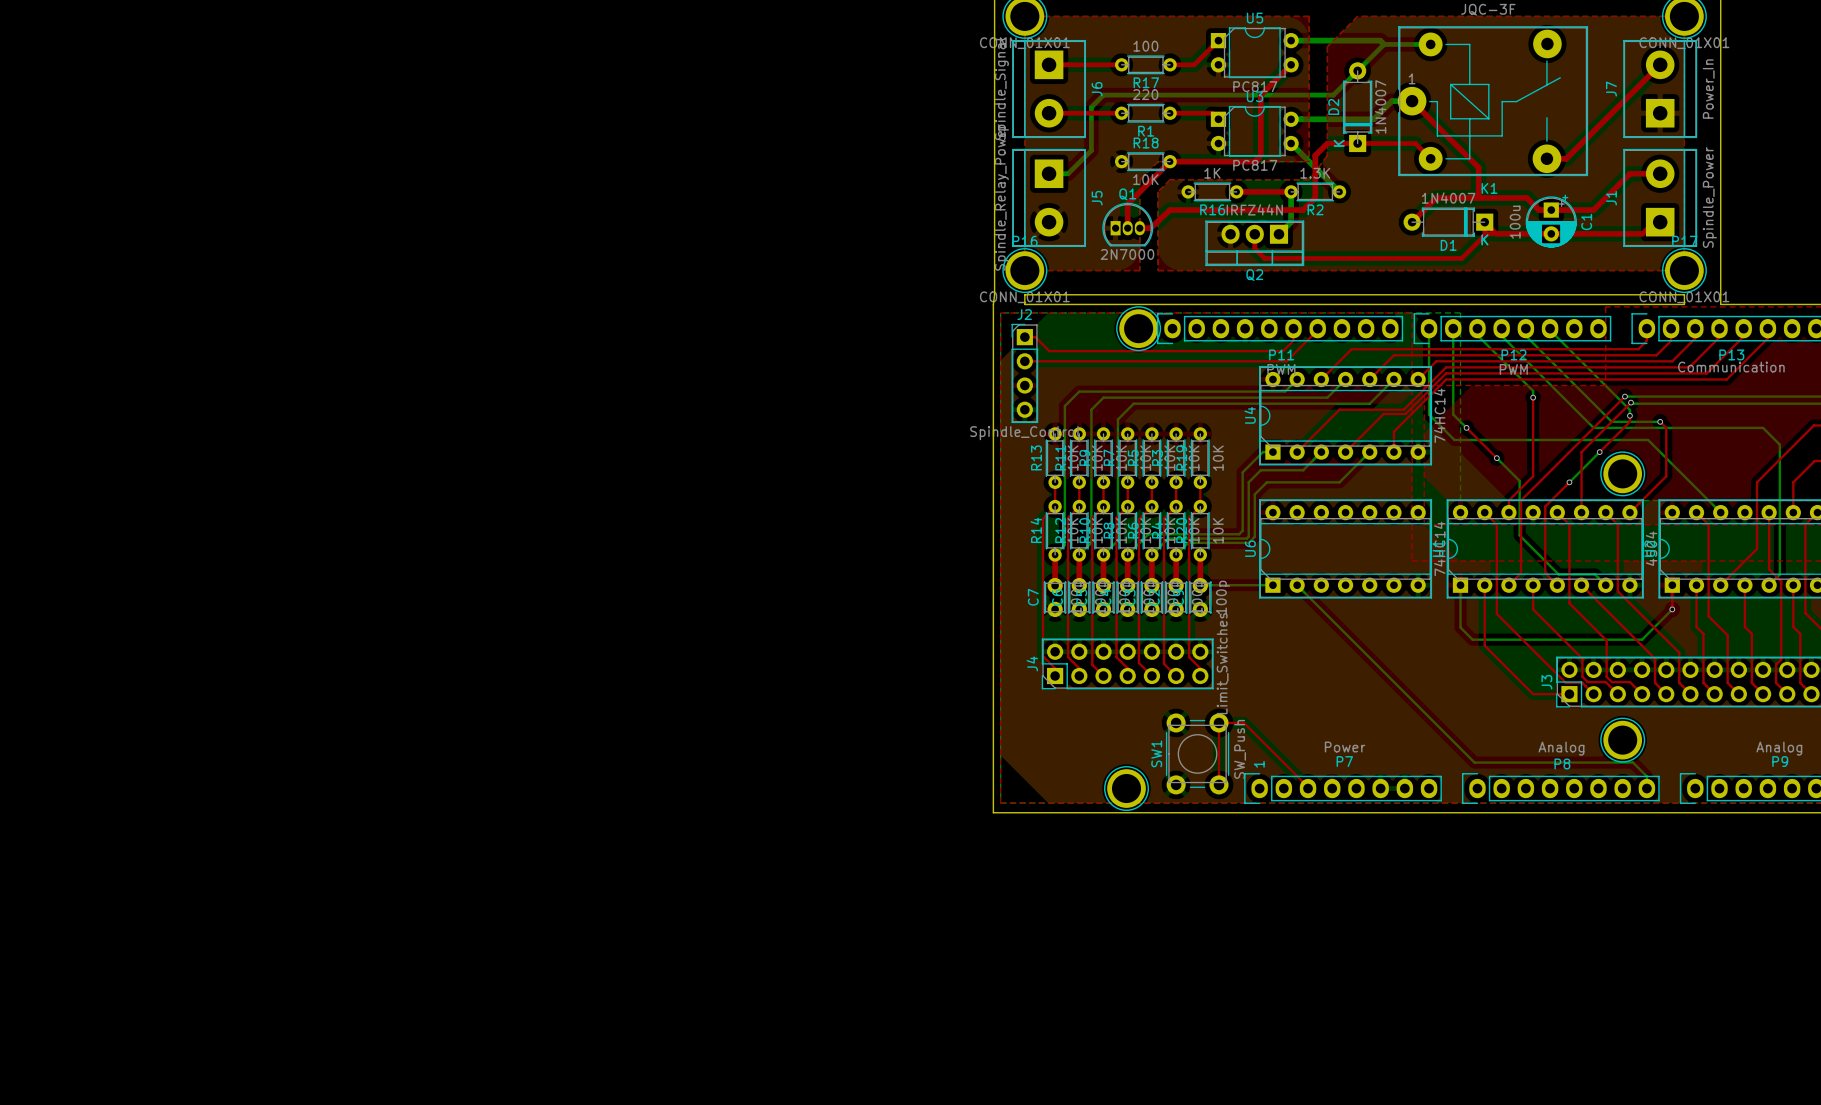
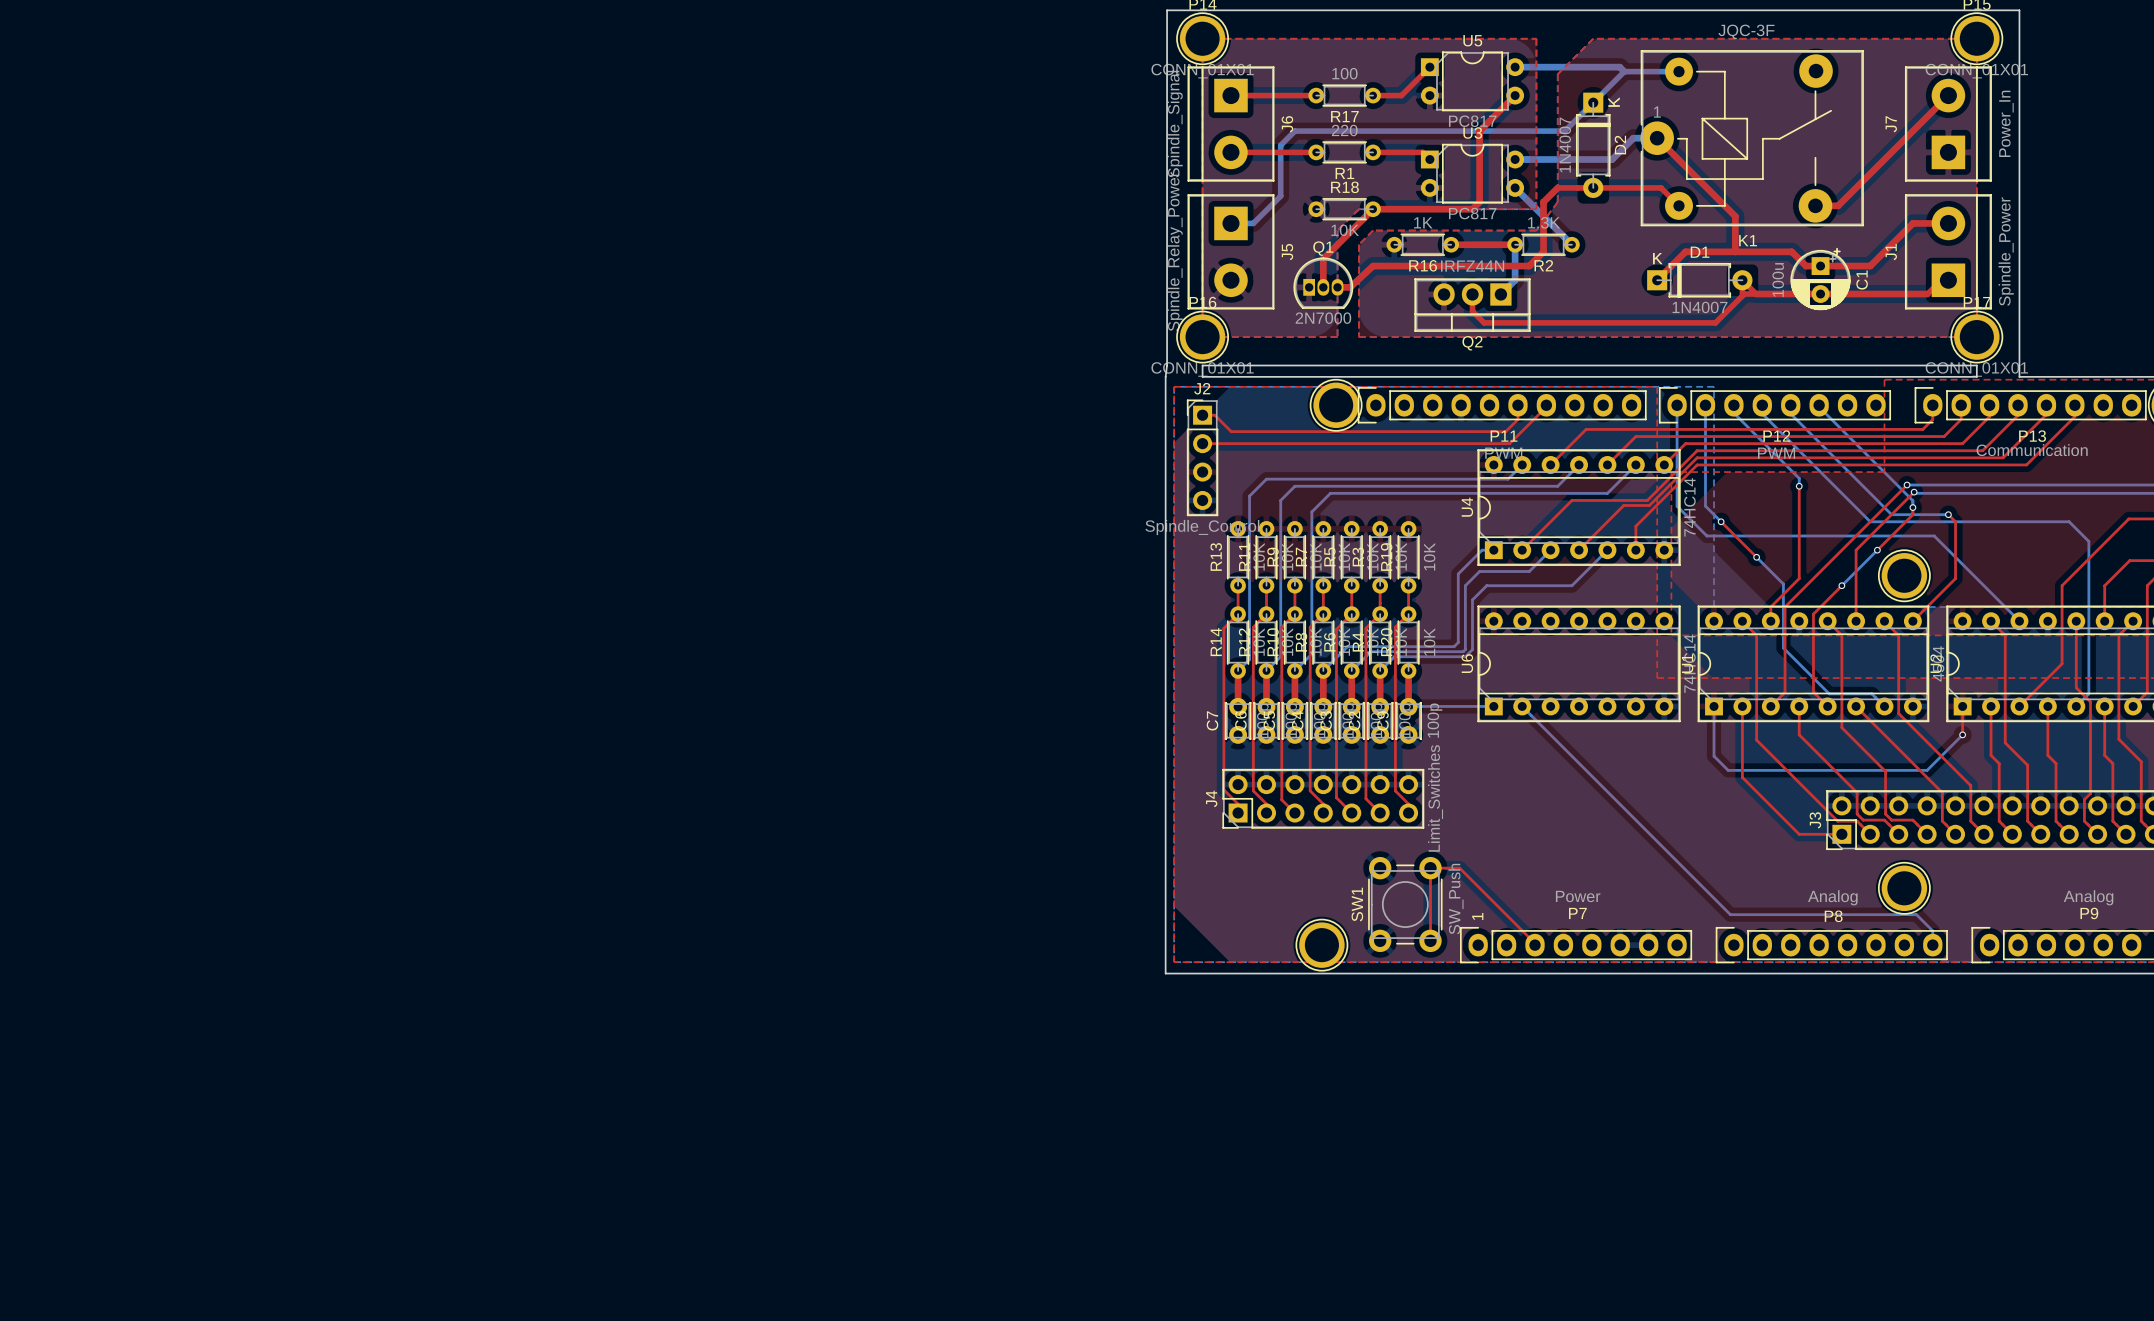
D2 rotation: 0° (1357, 107) -> 180° (1593, 145)
D1 rotation: 0° (1448, 222) -> 180° (1699, 280)

